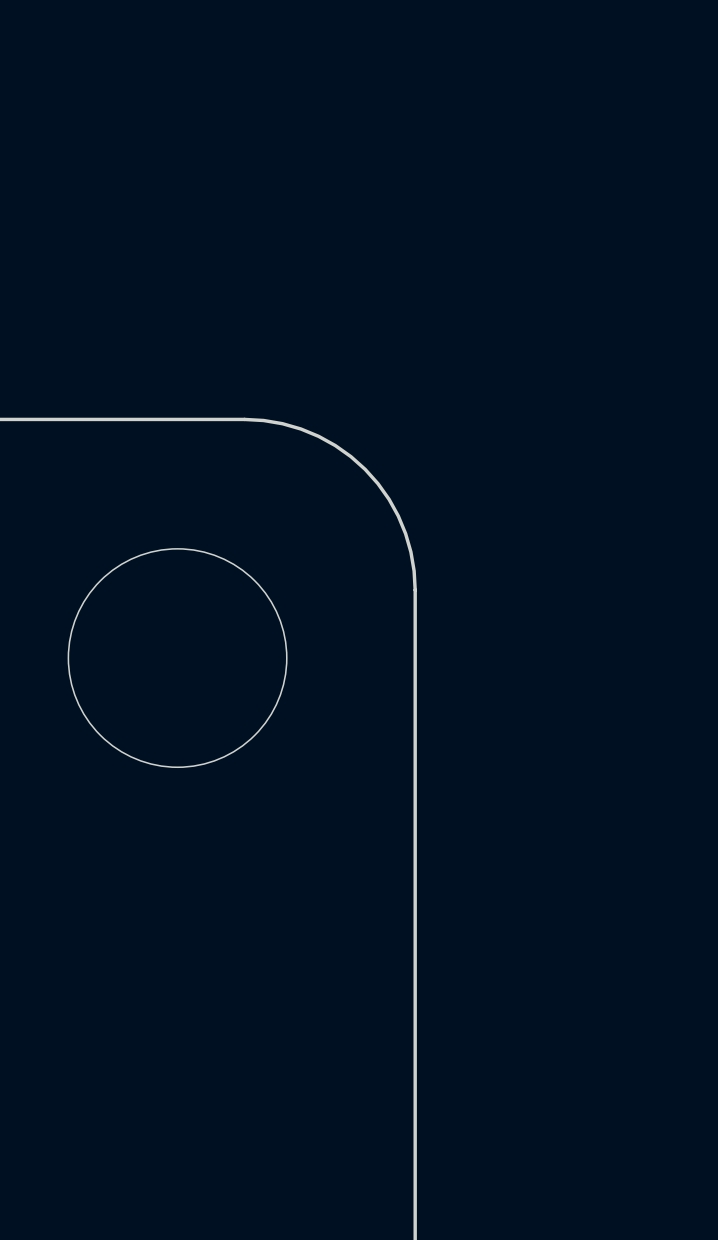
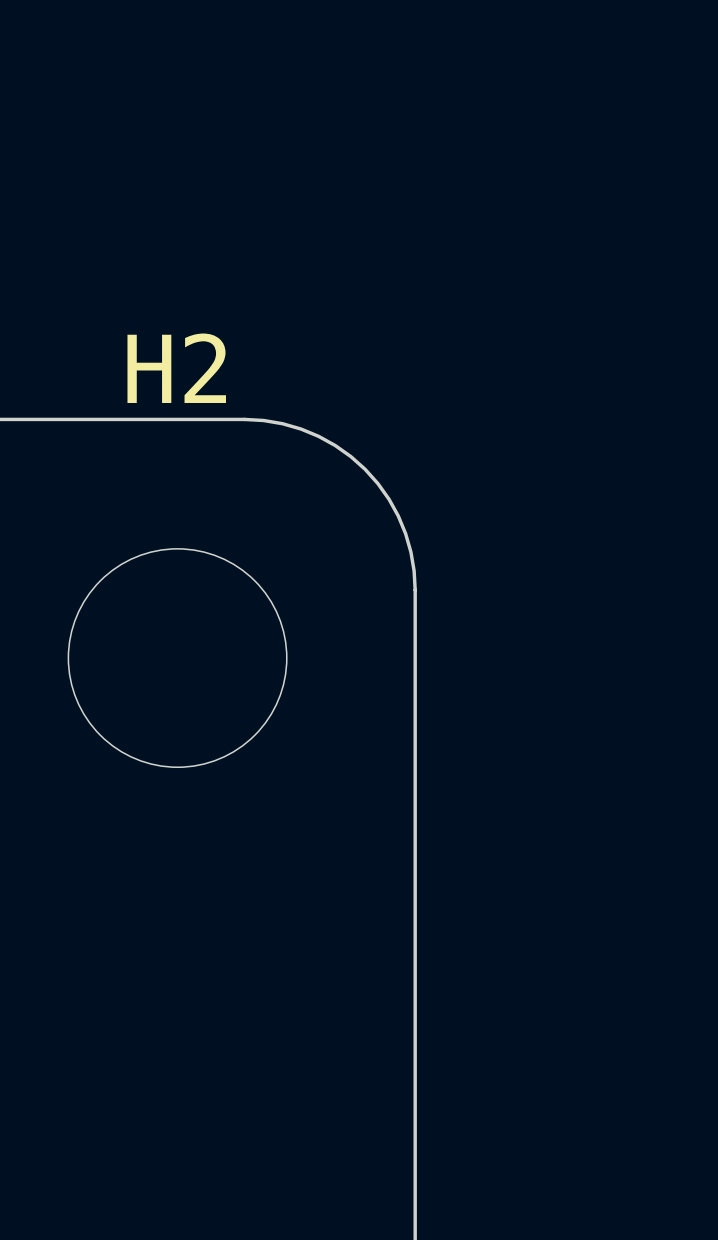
H2 name: none -> H2 (176, 368)

